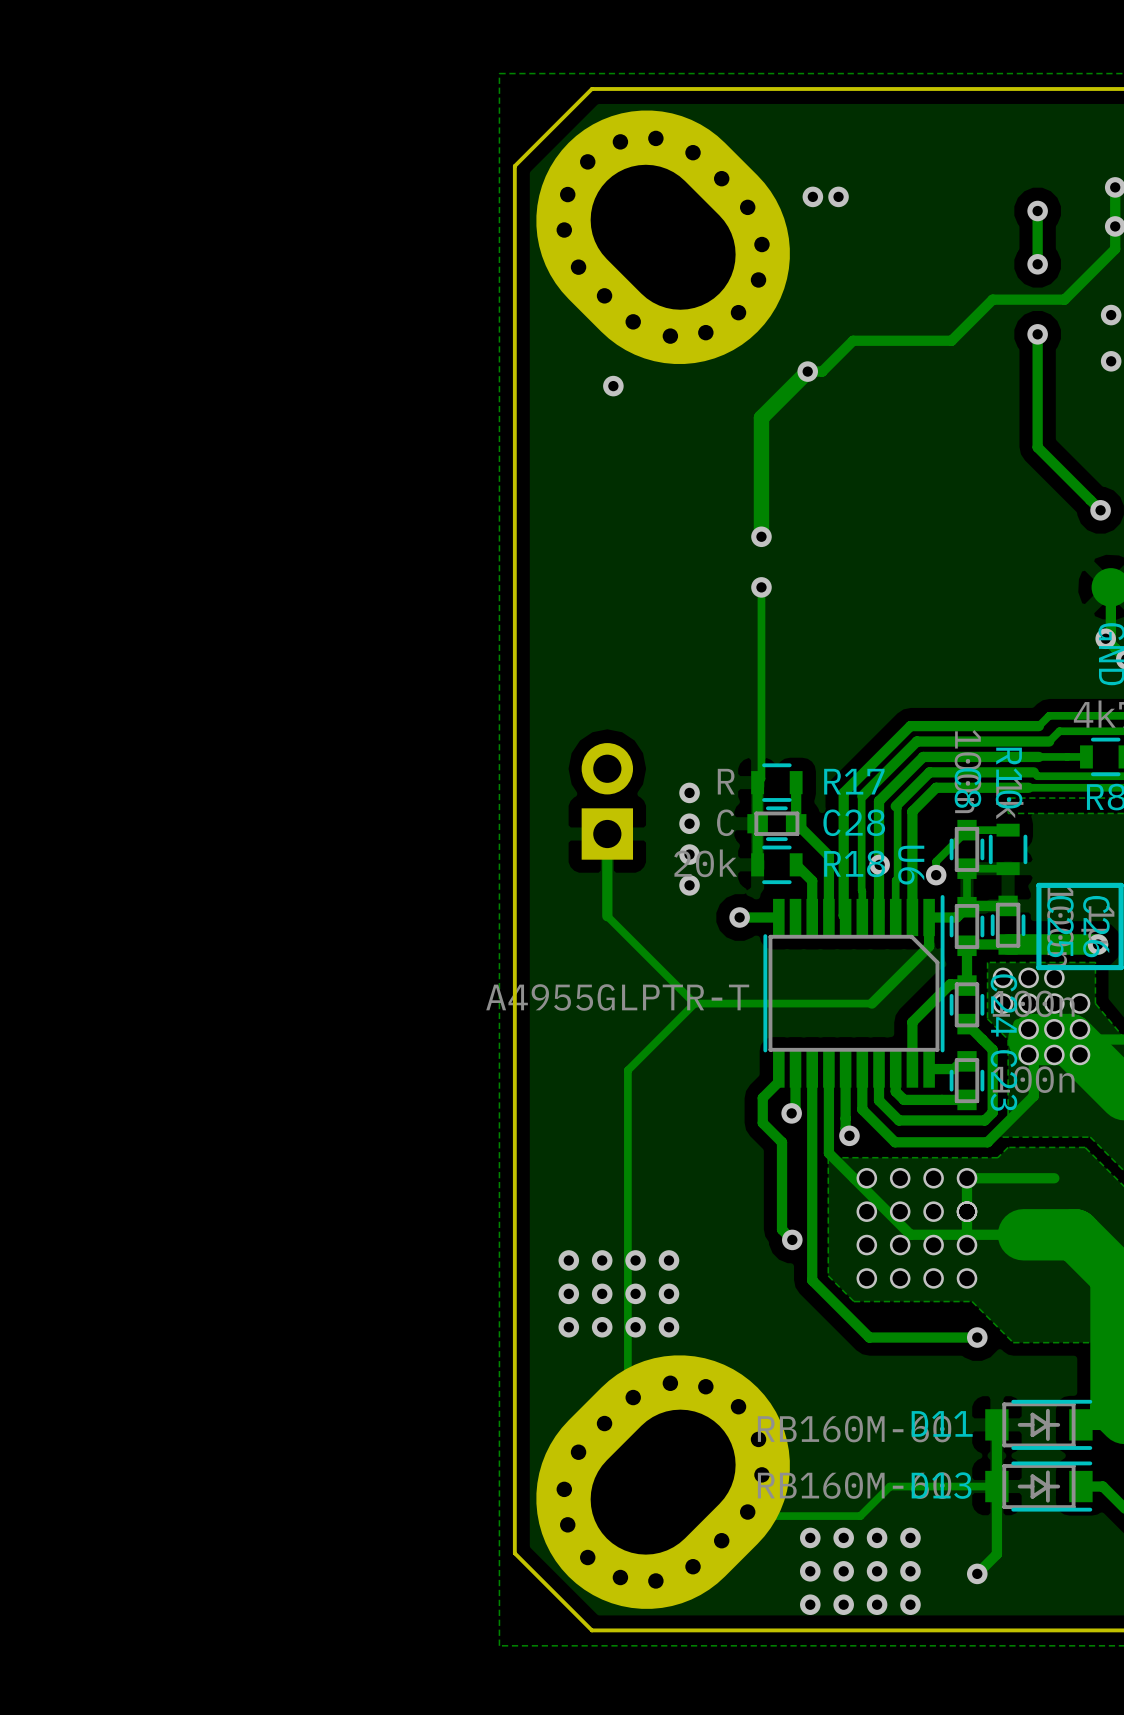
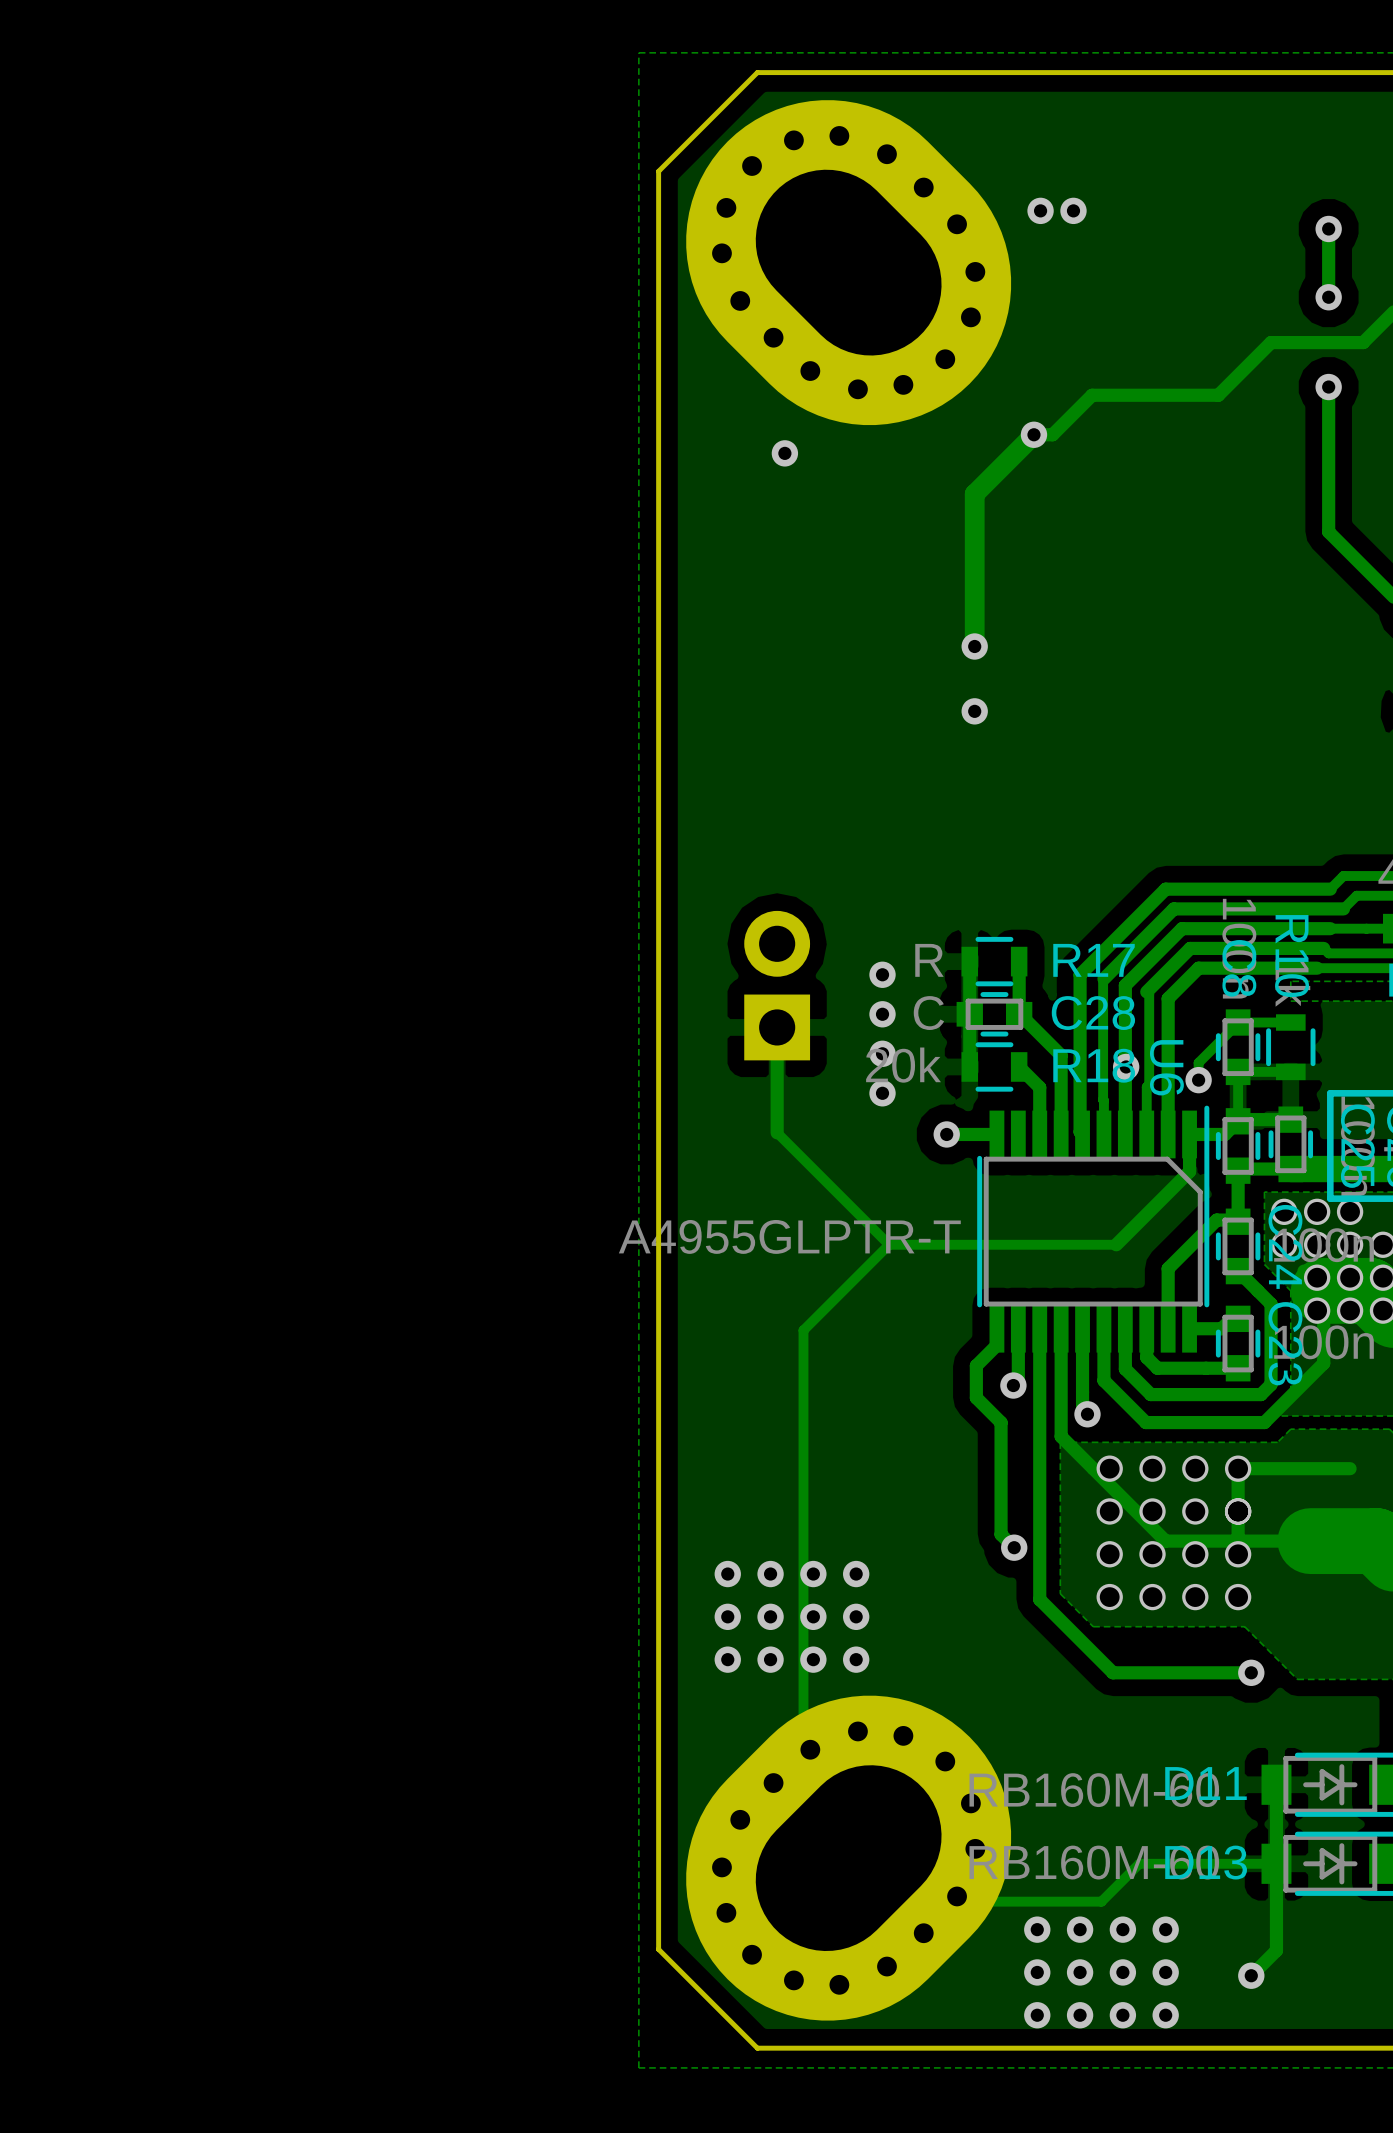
track: (761, 587) (761, 778) (757, 782) -> none

